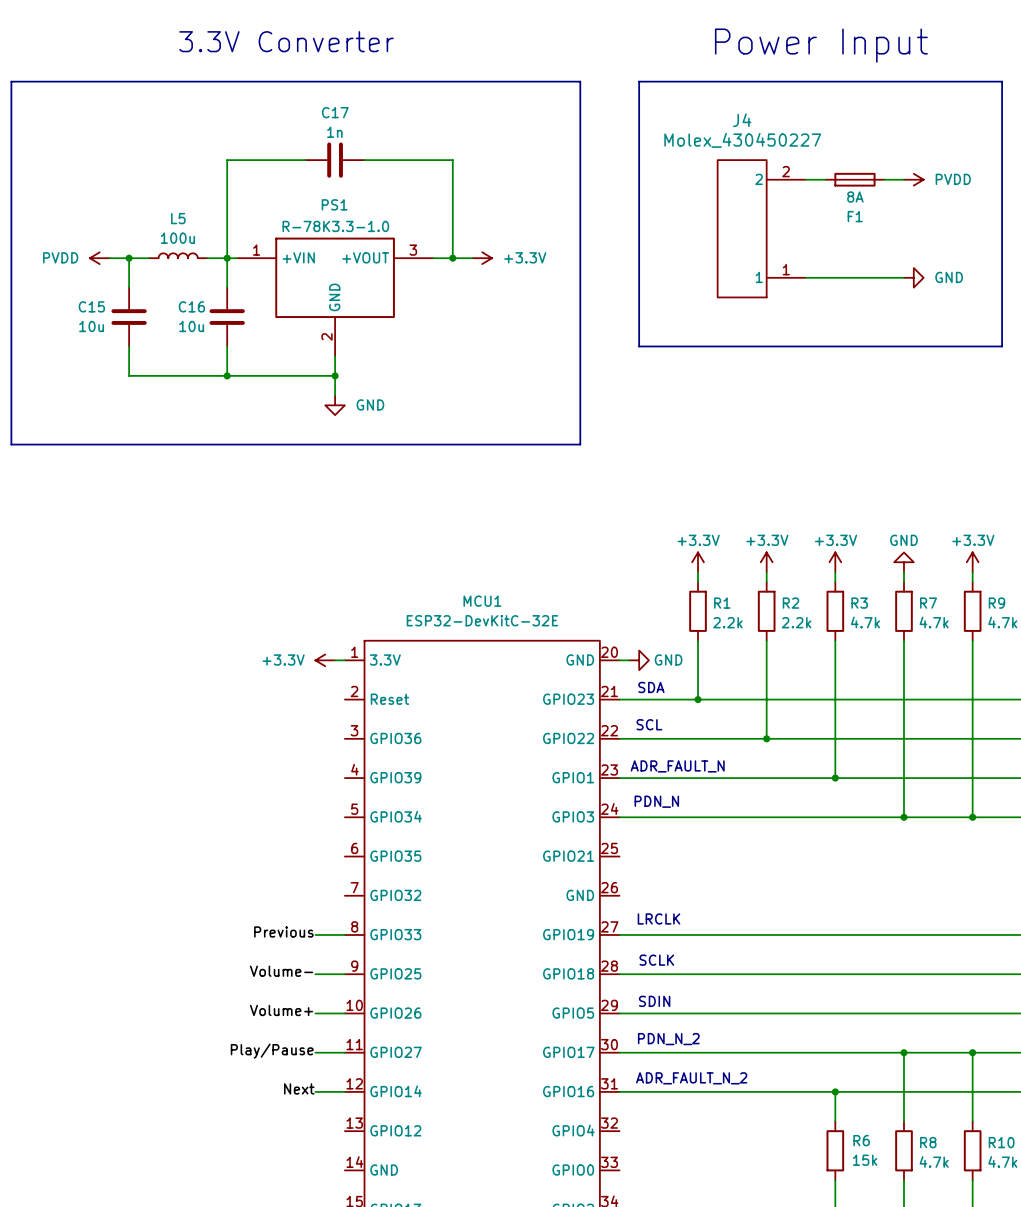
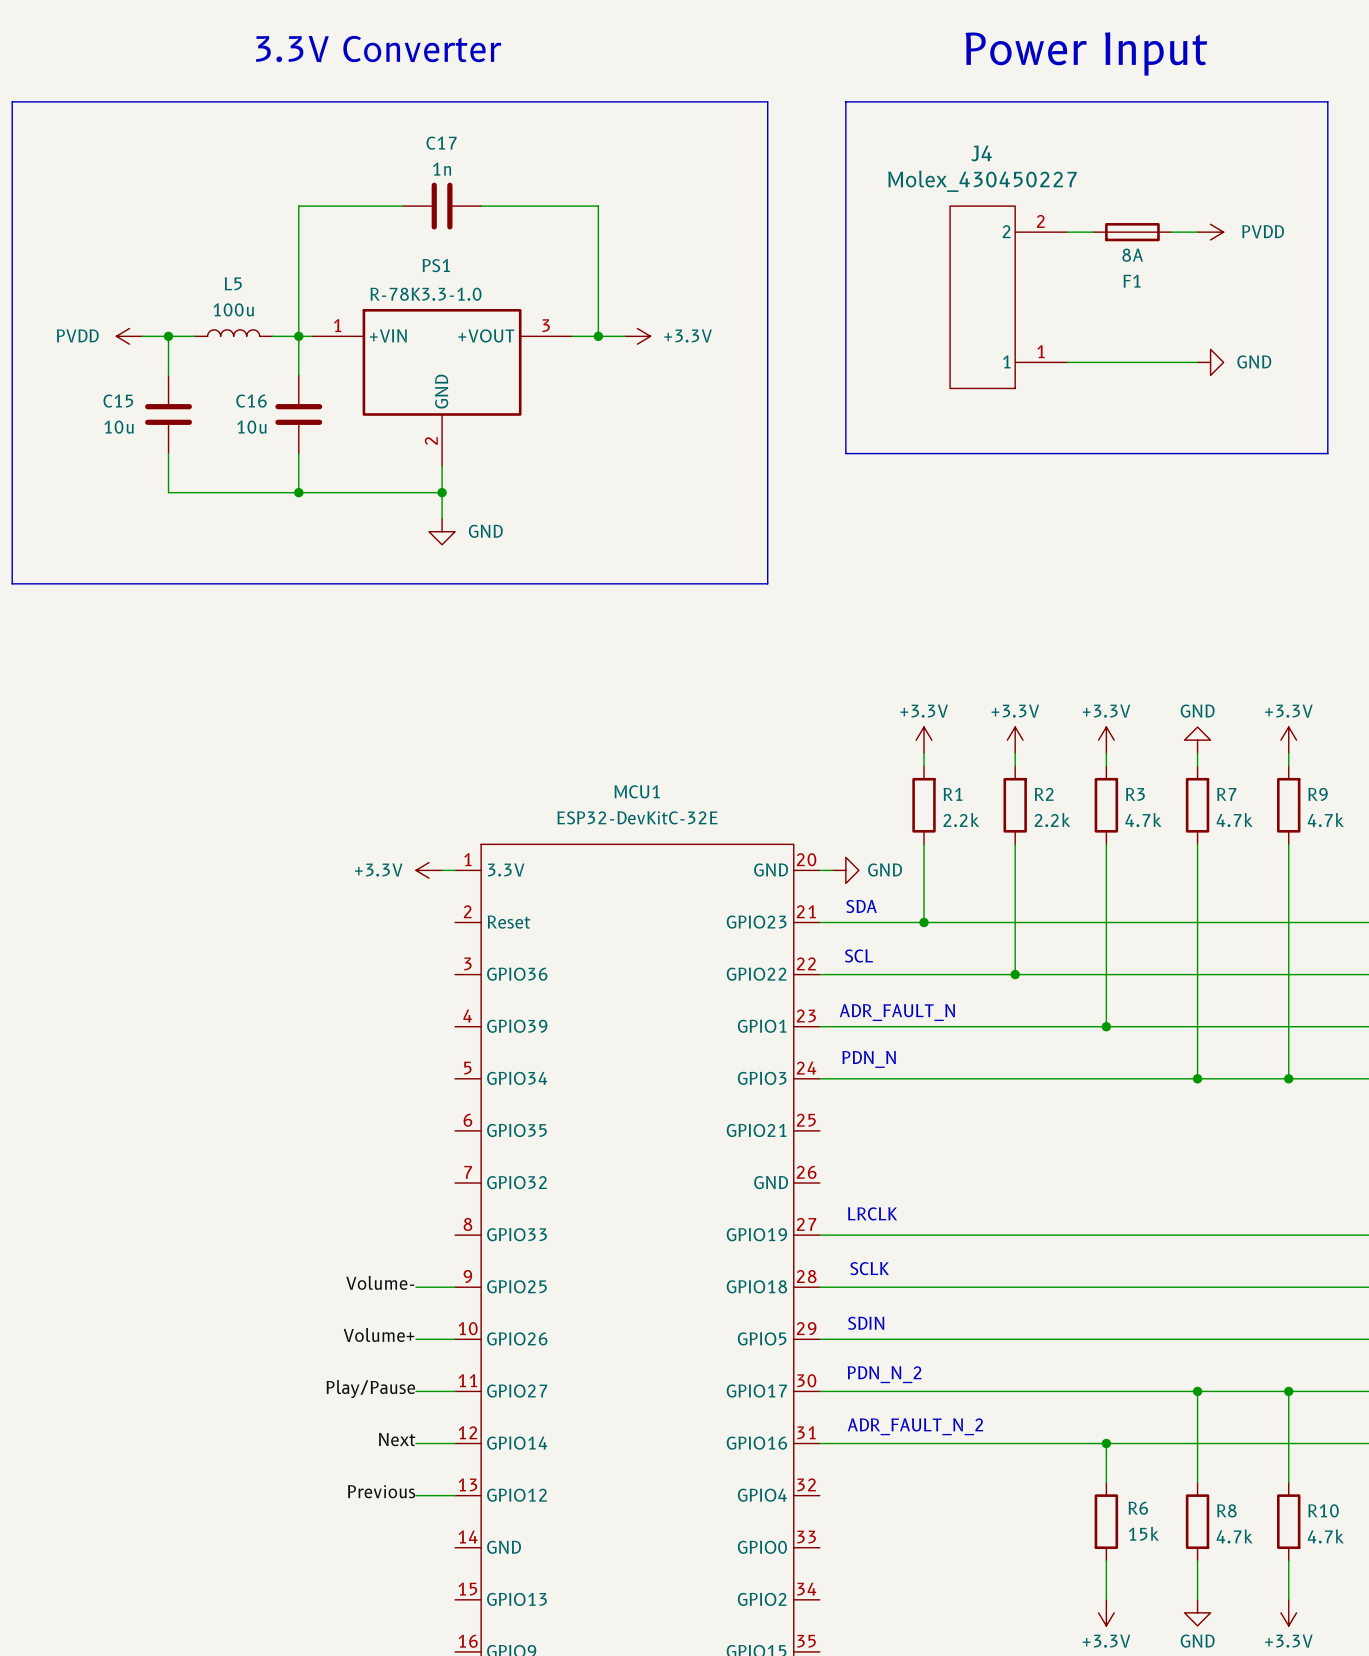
label: Previous (283, 931) -> none
wire: (315, 935) (344, 935) -> none
label: none -> Previous (381, 1491)
wire: none -> (416, 1495) (455, 1495)

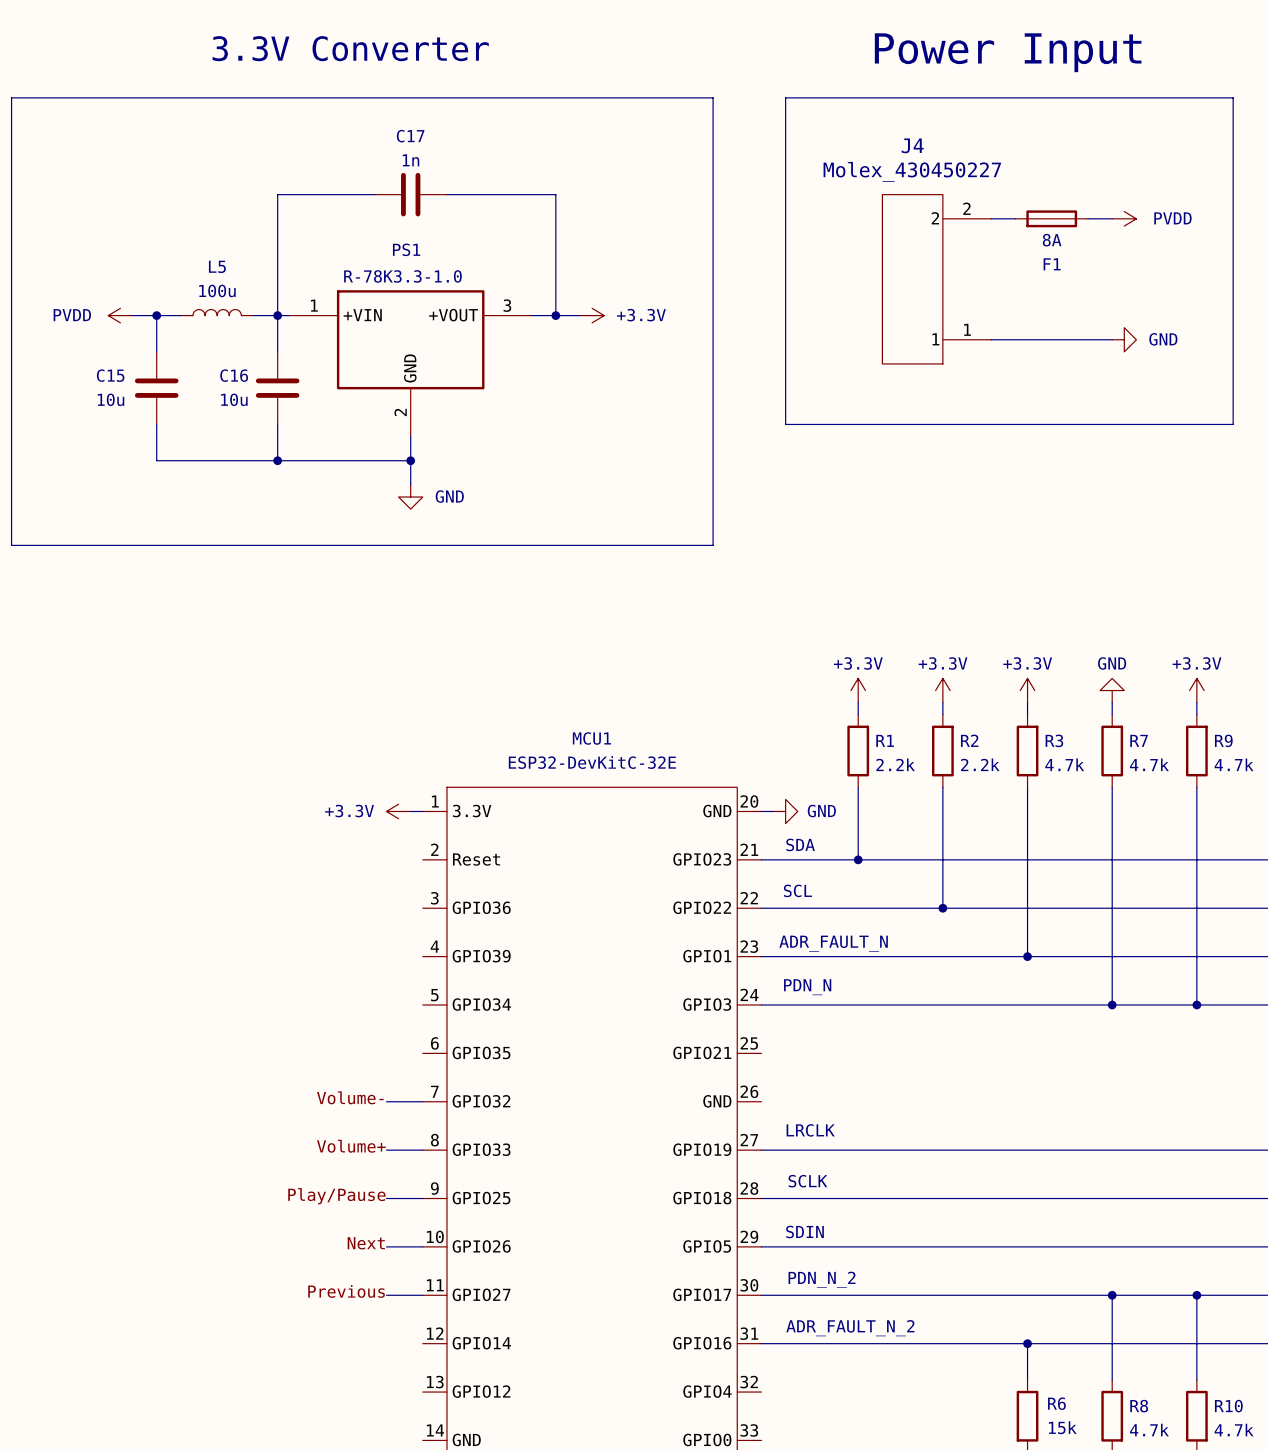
label: none -> Volume- (350, 1097)
wire: none -> (386, 1101) (422, 1101)
label: none -> Volume+ (351, 1146)
label: Volume- (380, 1282) -> Play/Pause (336, 1196)
label: Volume+ (379, 1334) -> Next (366, 1243)
label: Play/Pause (370, 1389) -> Previous (346, 1291)
label: Next (397, 1439) -> none
wire: (416, 1443) (455, 1443) -> (386, 1150) (422, 1150)
label: Previous (381, 1491) -> none
wire: (416, 1495) (455, 1495) -> none

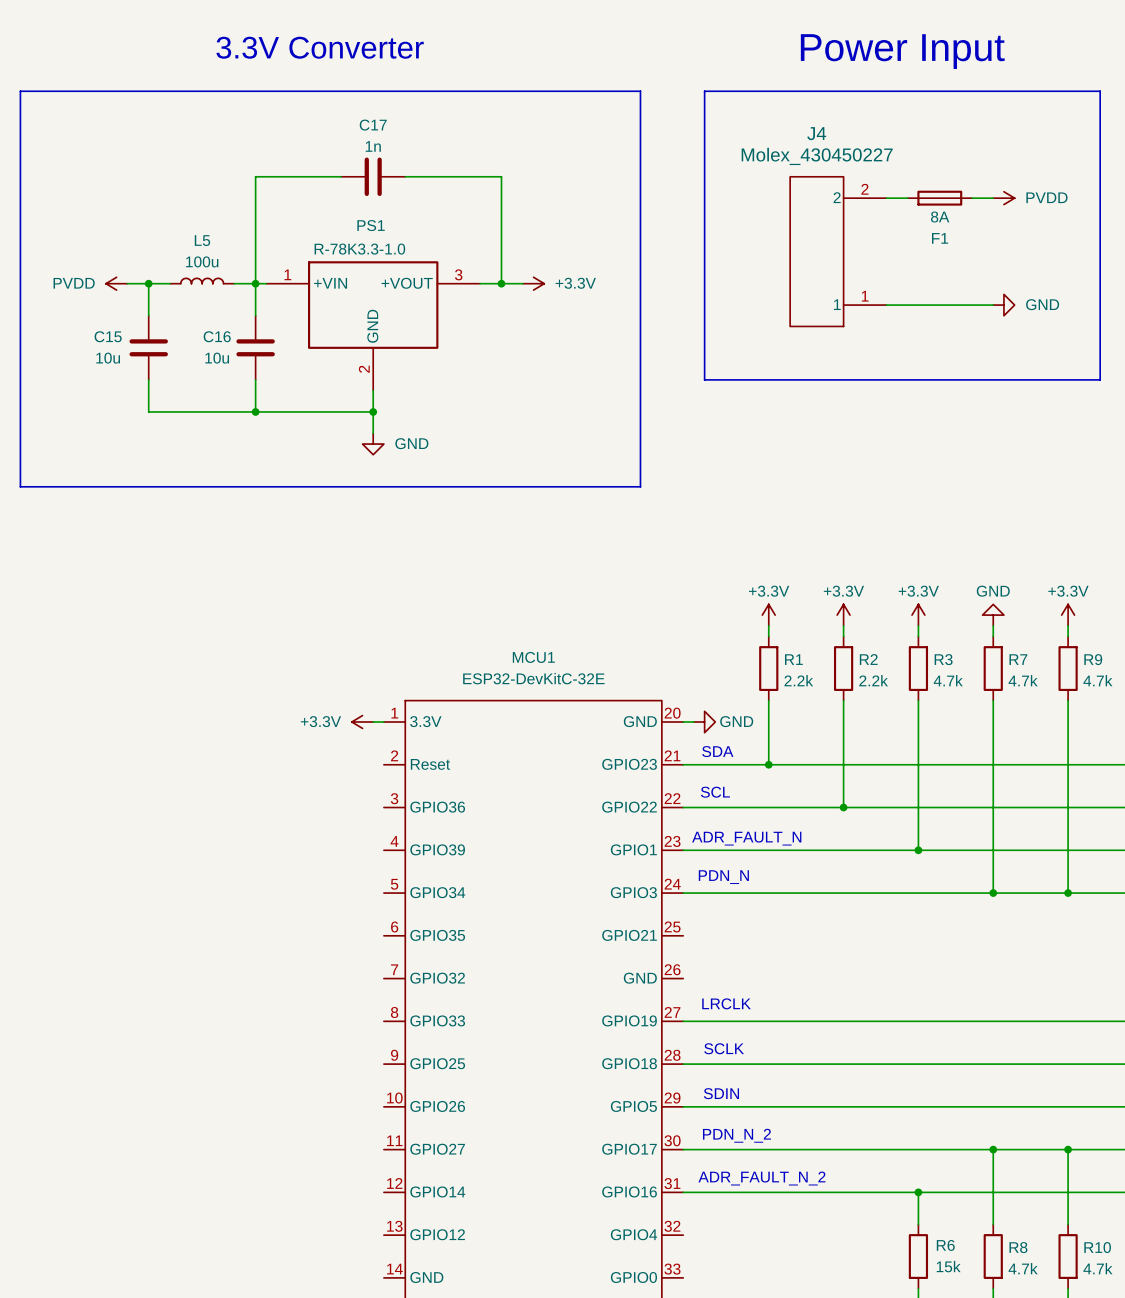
label: Volume- (350, 1097) -> none
wire: (386, 1101) (422, 1101) -> none
label: Volume+ (351, 1146) -> none
wire: (386, 1150) (422, 1150) -> none
label: Play/Pause (336, 1196) -> none
wire: (386, 1198) (422, 1198) -> none
label: Next (366, 1243) -> none
wire: (386, 1246) (422, 1246) -> none
label: Previous (346, 1291) -> none
wire: (386, 1295) (422, 1295) -> none

